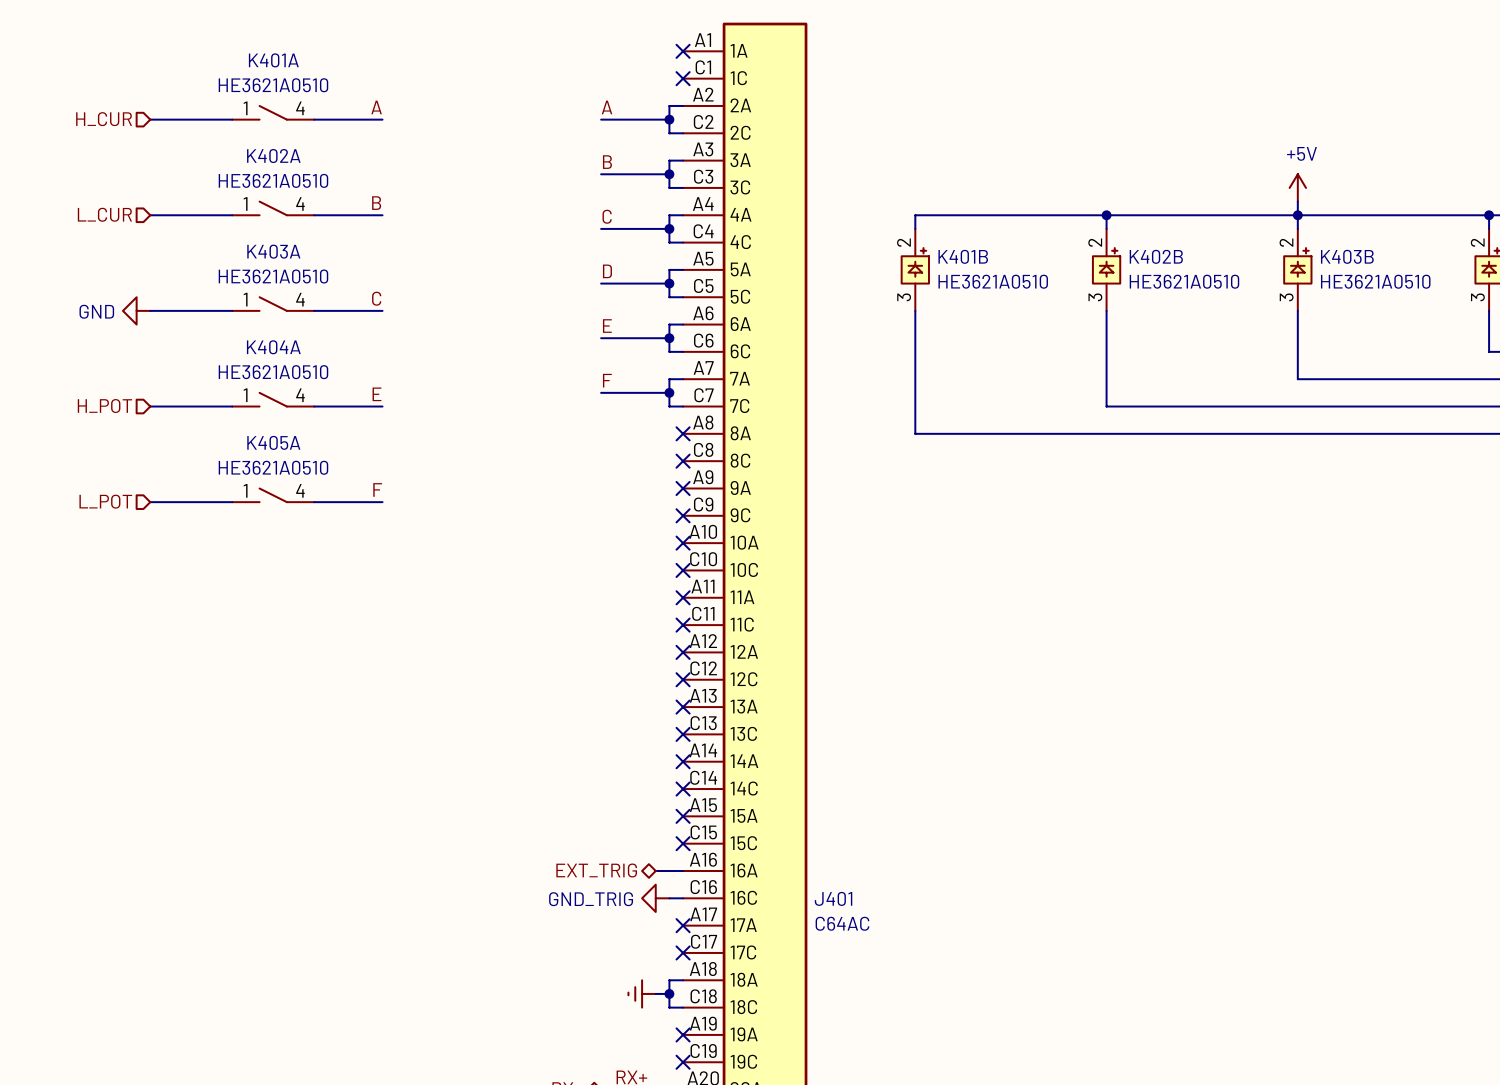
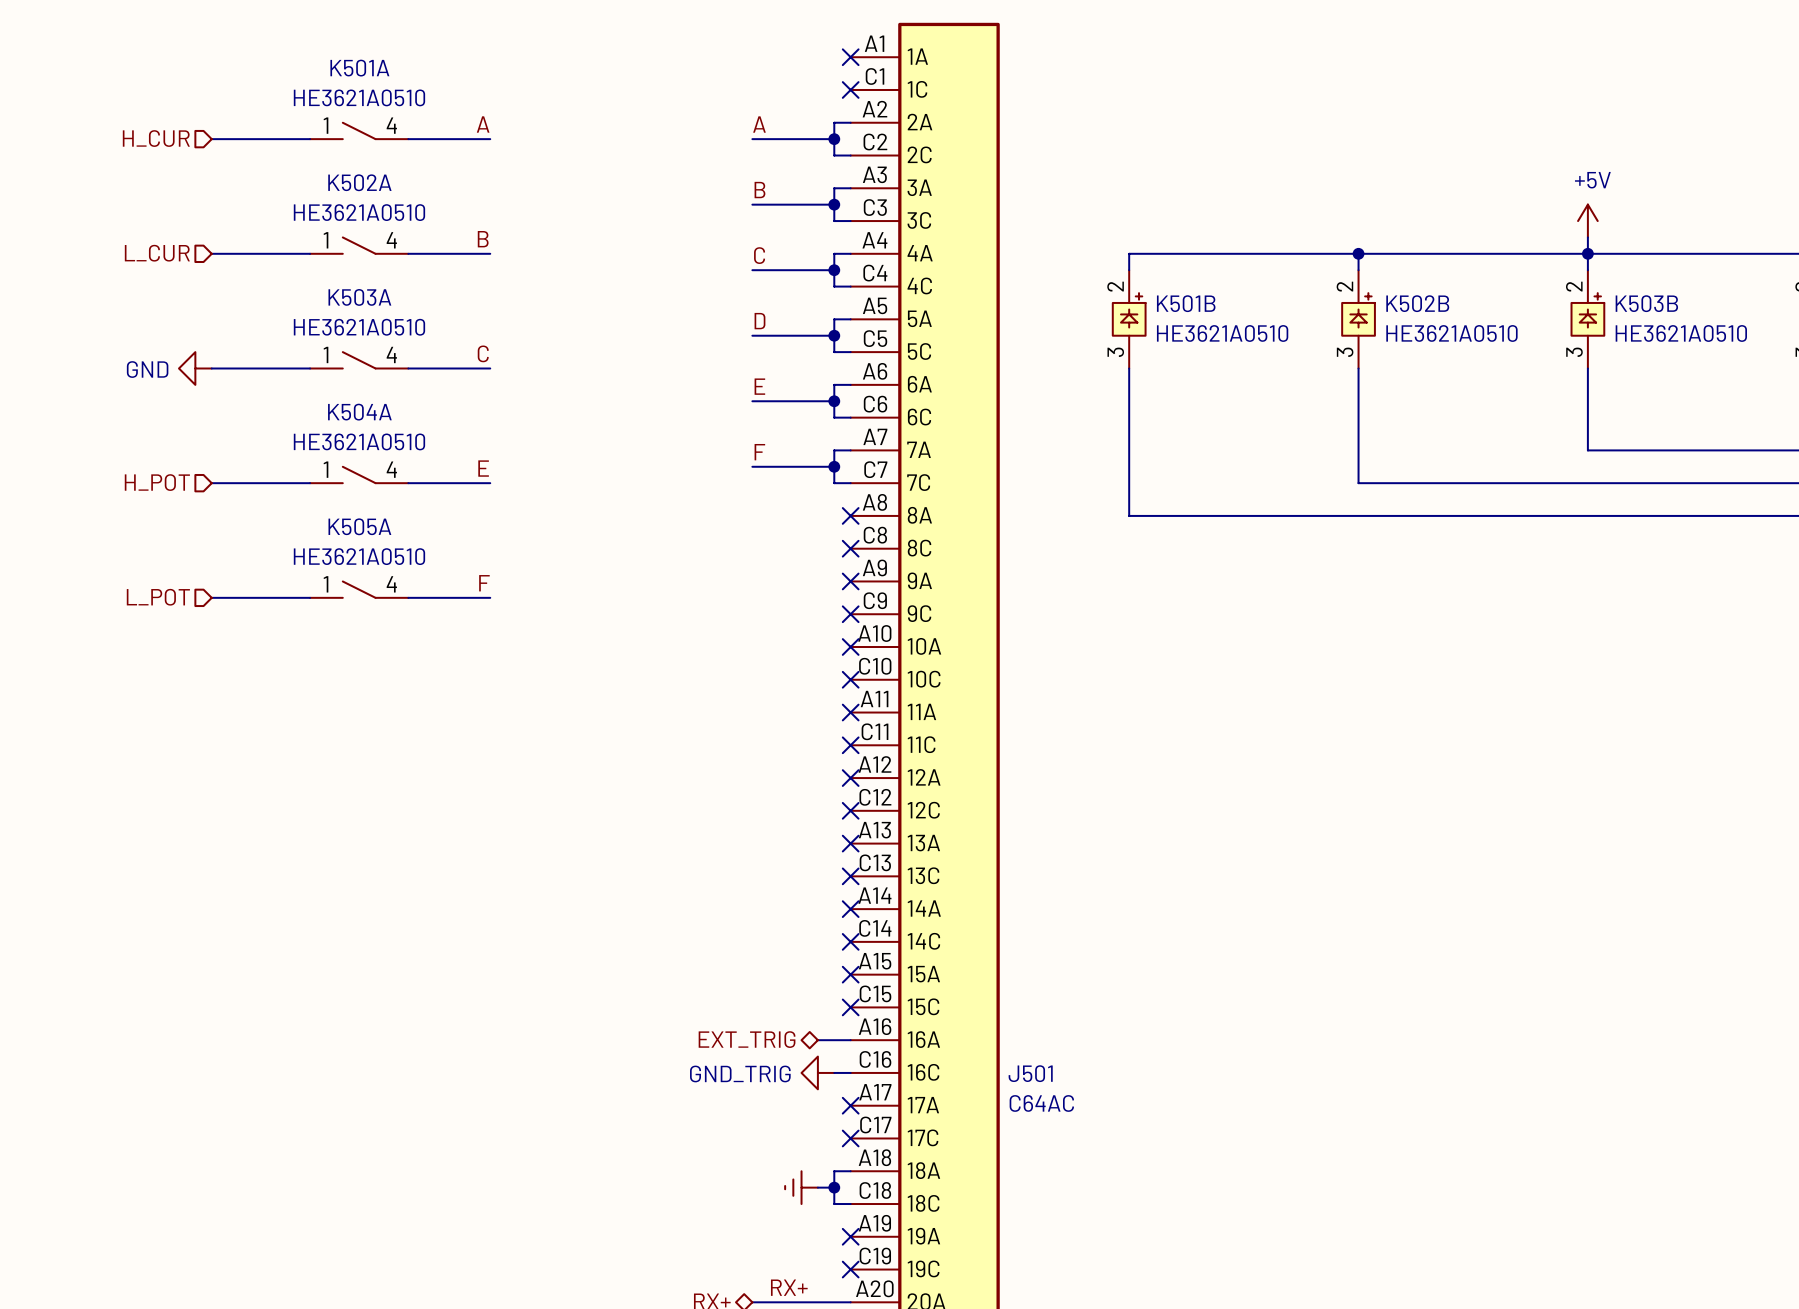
K401A name: K401A (273, 60) -> K501A (359, 68)
K402A name: K402A (273, 156) -> K502A (359, 182)
K403A name: K403A (273, 251) -> K503A (359, 297)
K401B name: K401B (963, 256) -> K501B (1186, 303)
K402B name: K402B (1156, 256) -> K502B (1417, 303)
K403B name: K403B (1347, 256) -> K503B (1646, 303)
K404A name: K404A (273, 347) -> K504A (359, 412)
K405A name: K405A (273, 442) -> K505A (359, 526)
J401 name: J401 (833, 898) -> J501 (1030, 1073)

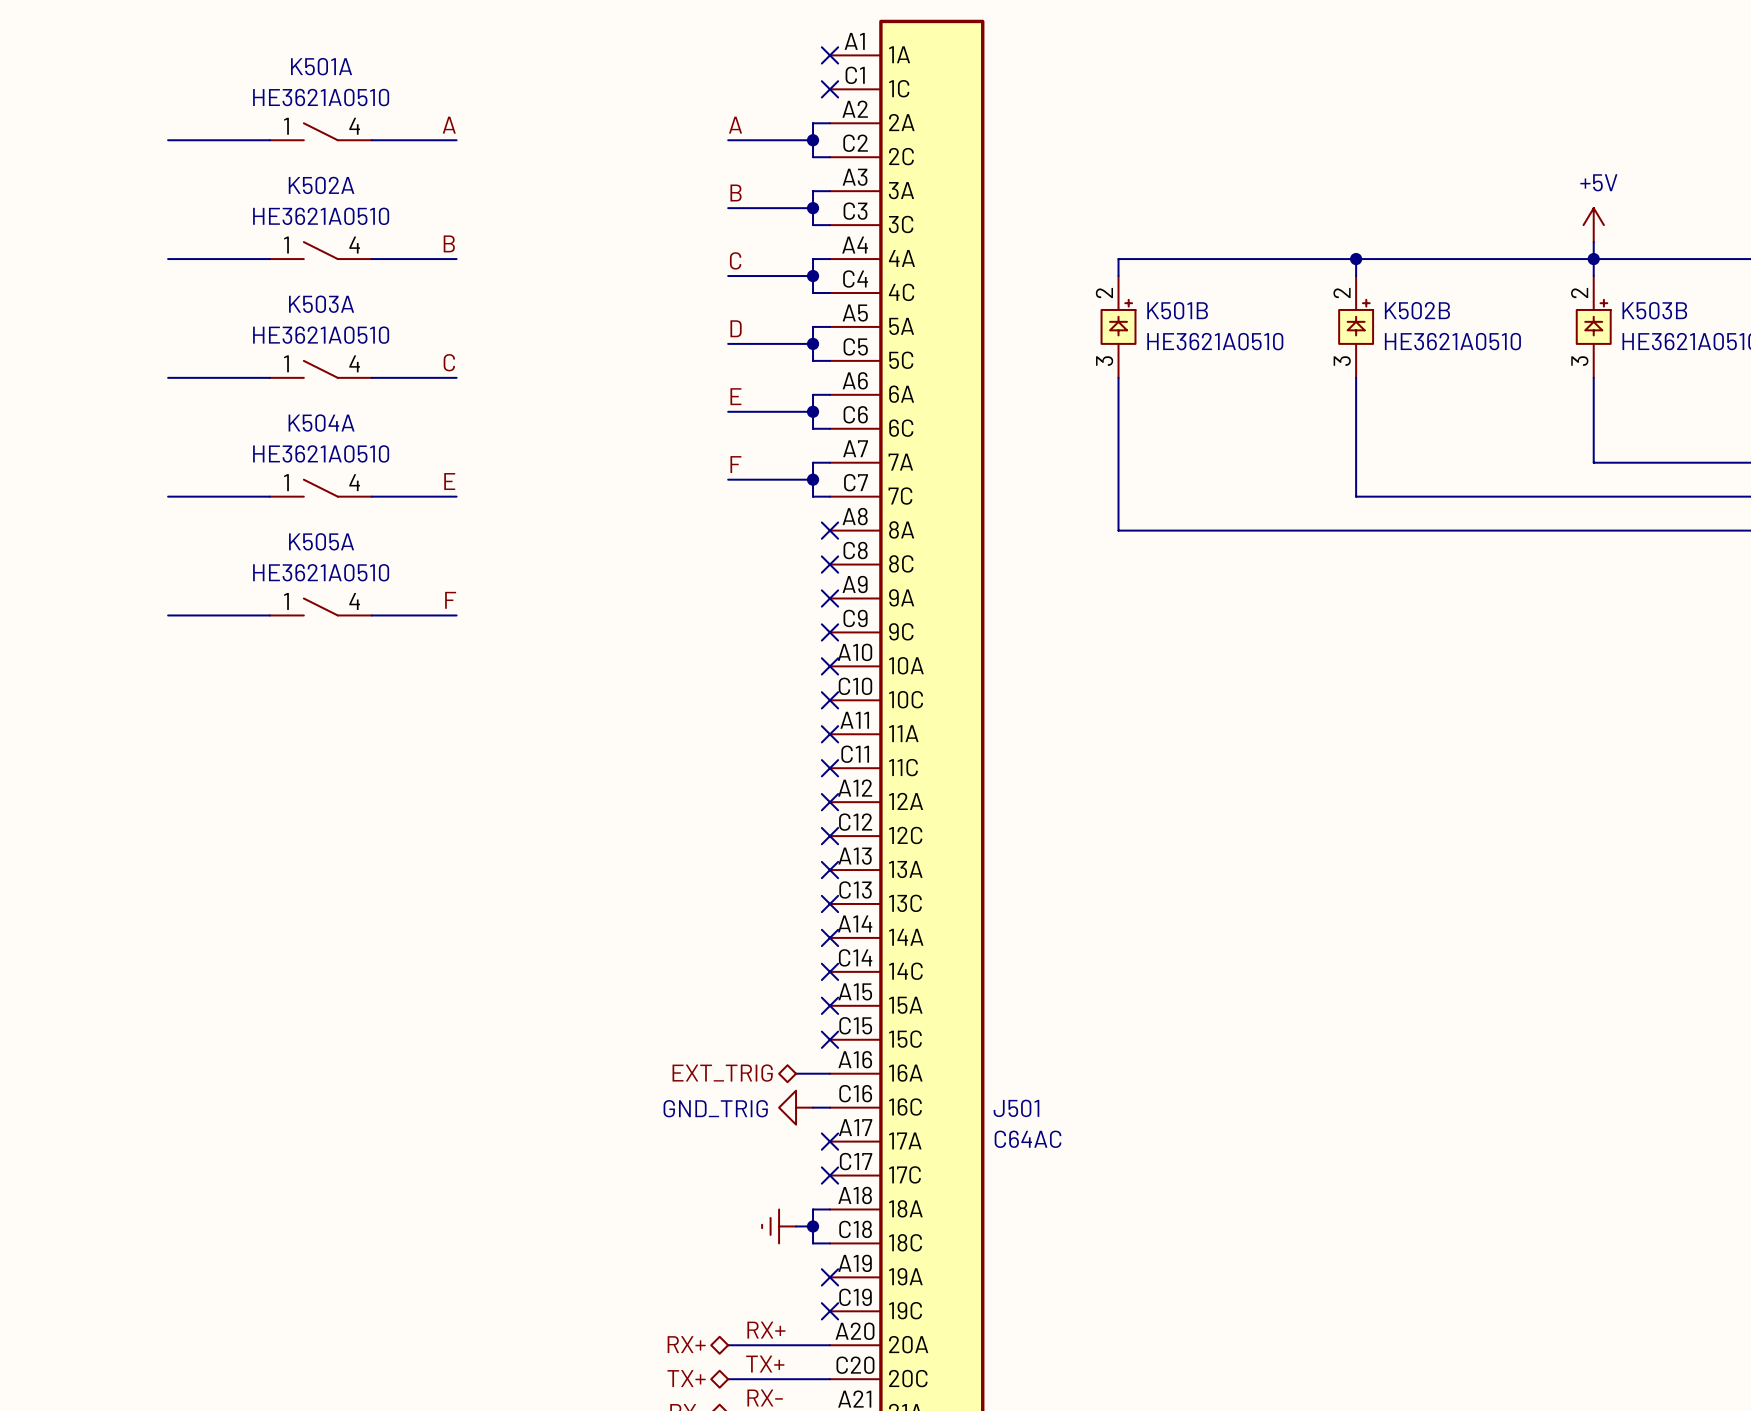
hierarchical label: H_CUR (156, 138) -> none
hierarchical label: L_CUR (157, 253) -> none
power symbol: GND (195, 368) -> none
hierarchical label: H_POT (157, 482) -> none
hierarchical label: L_POT (158, 597) -> none

